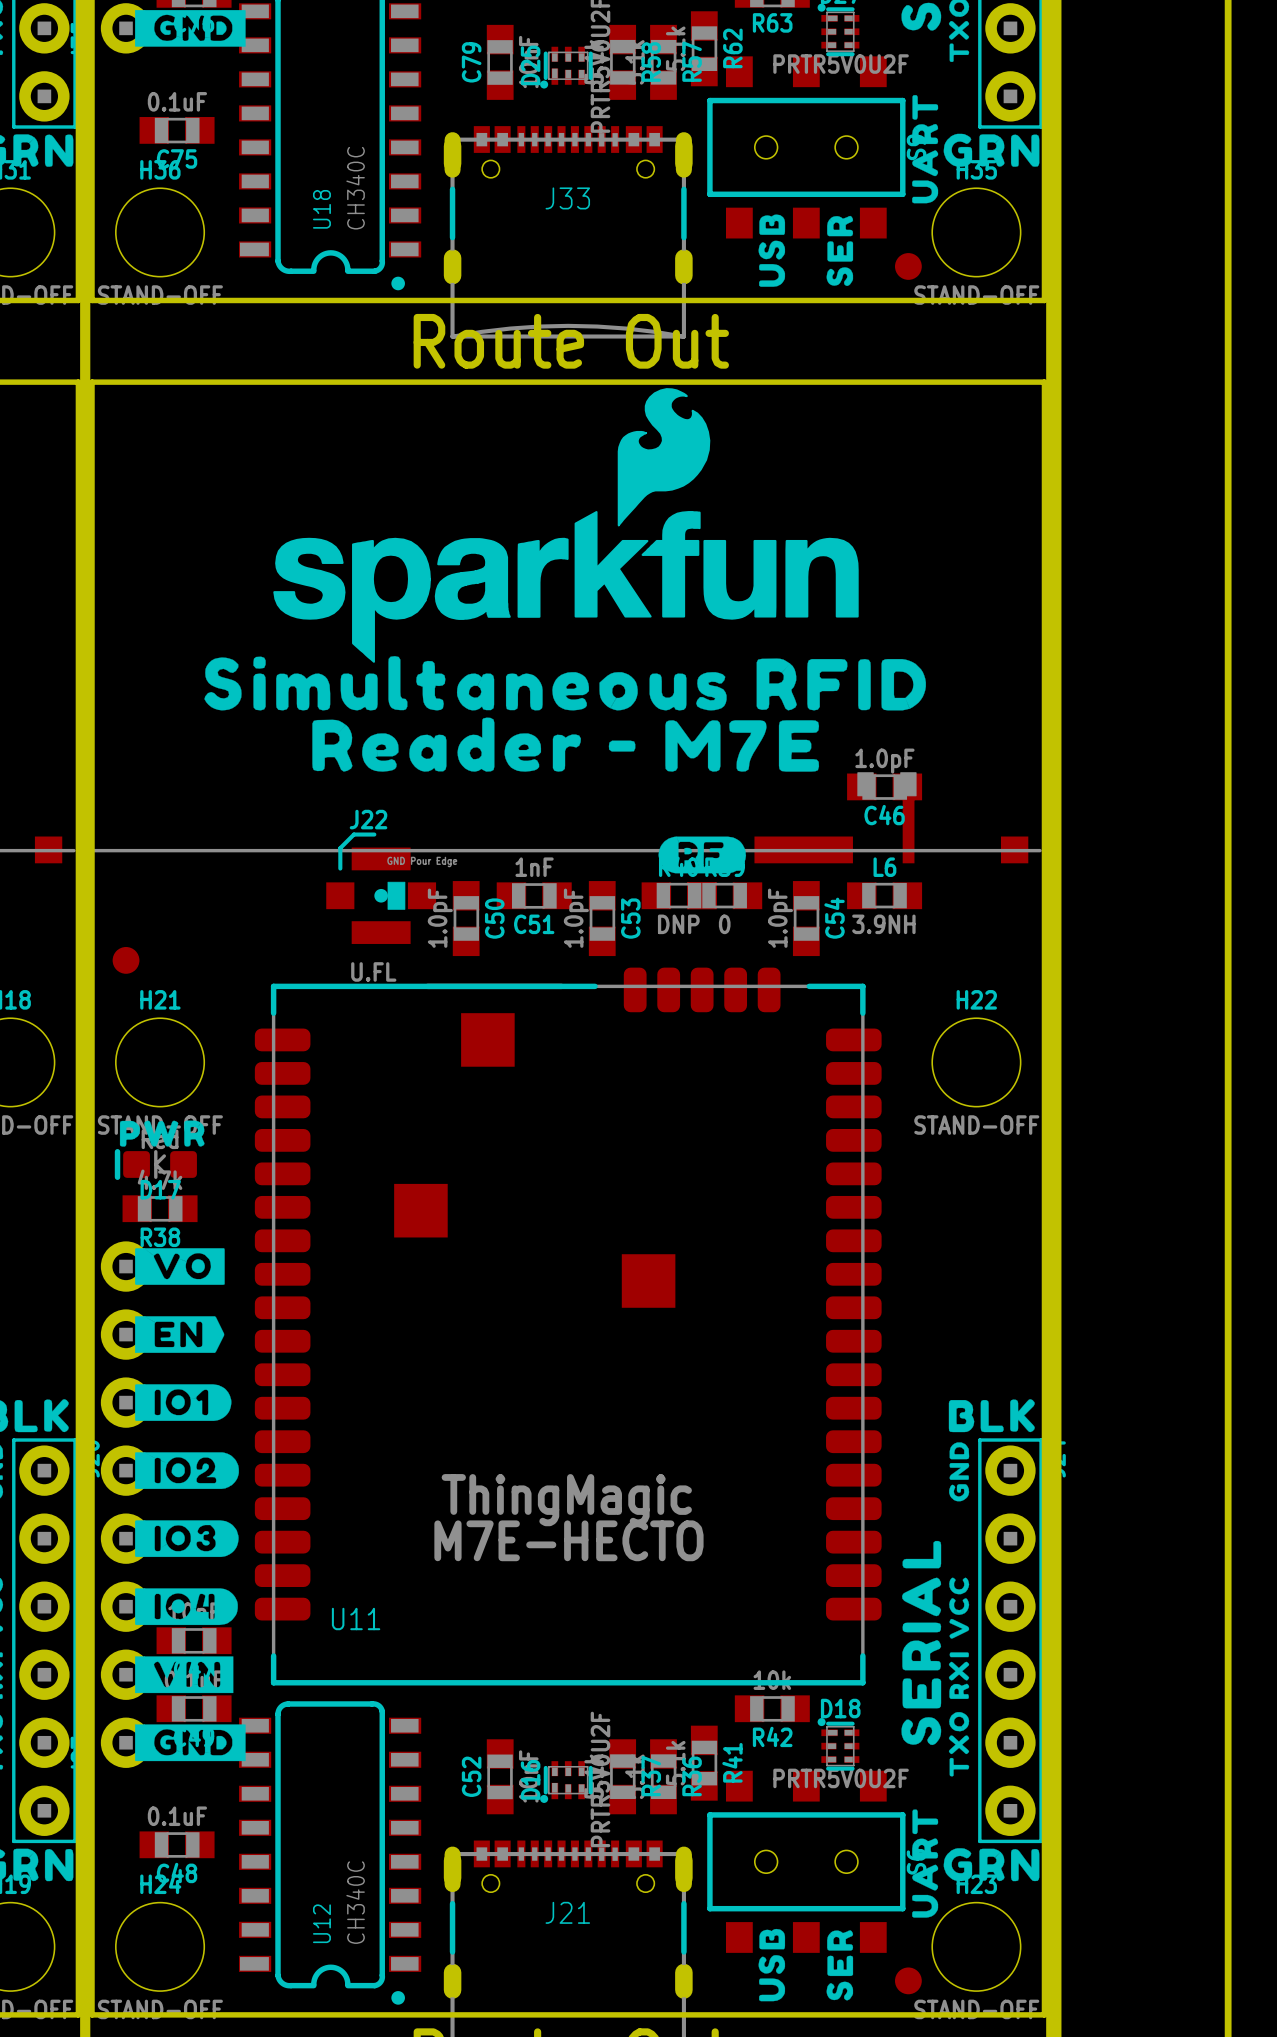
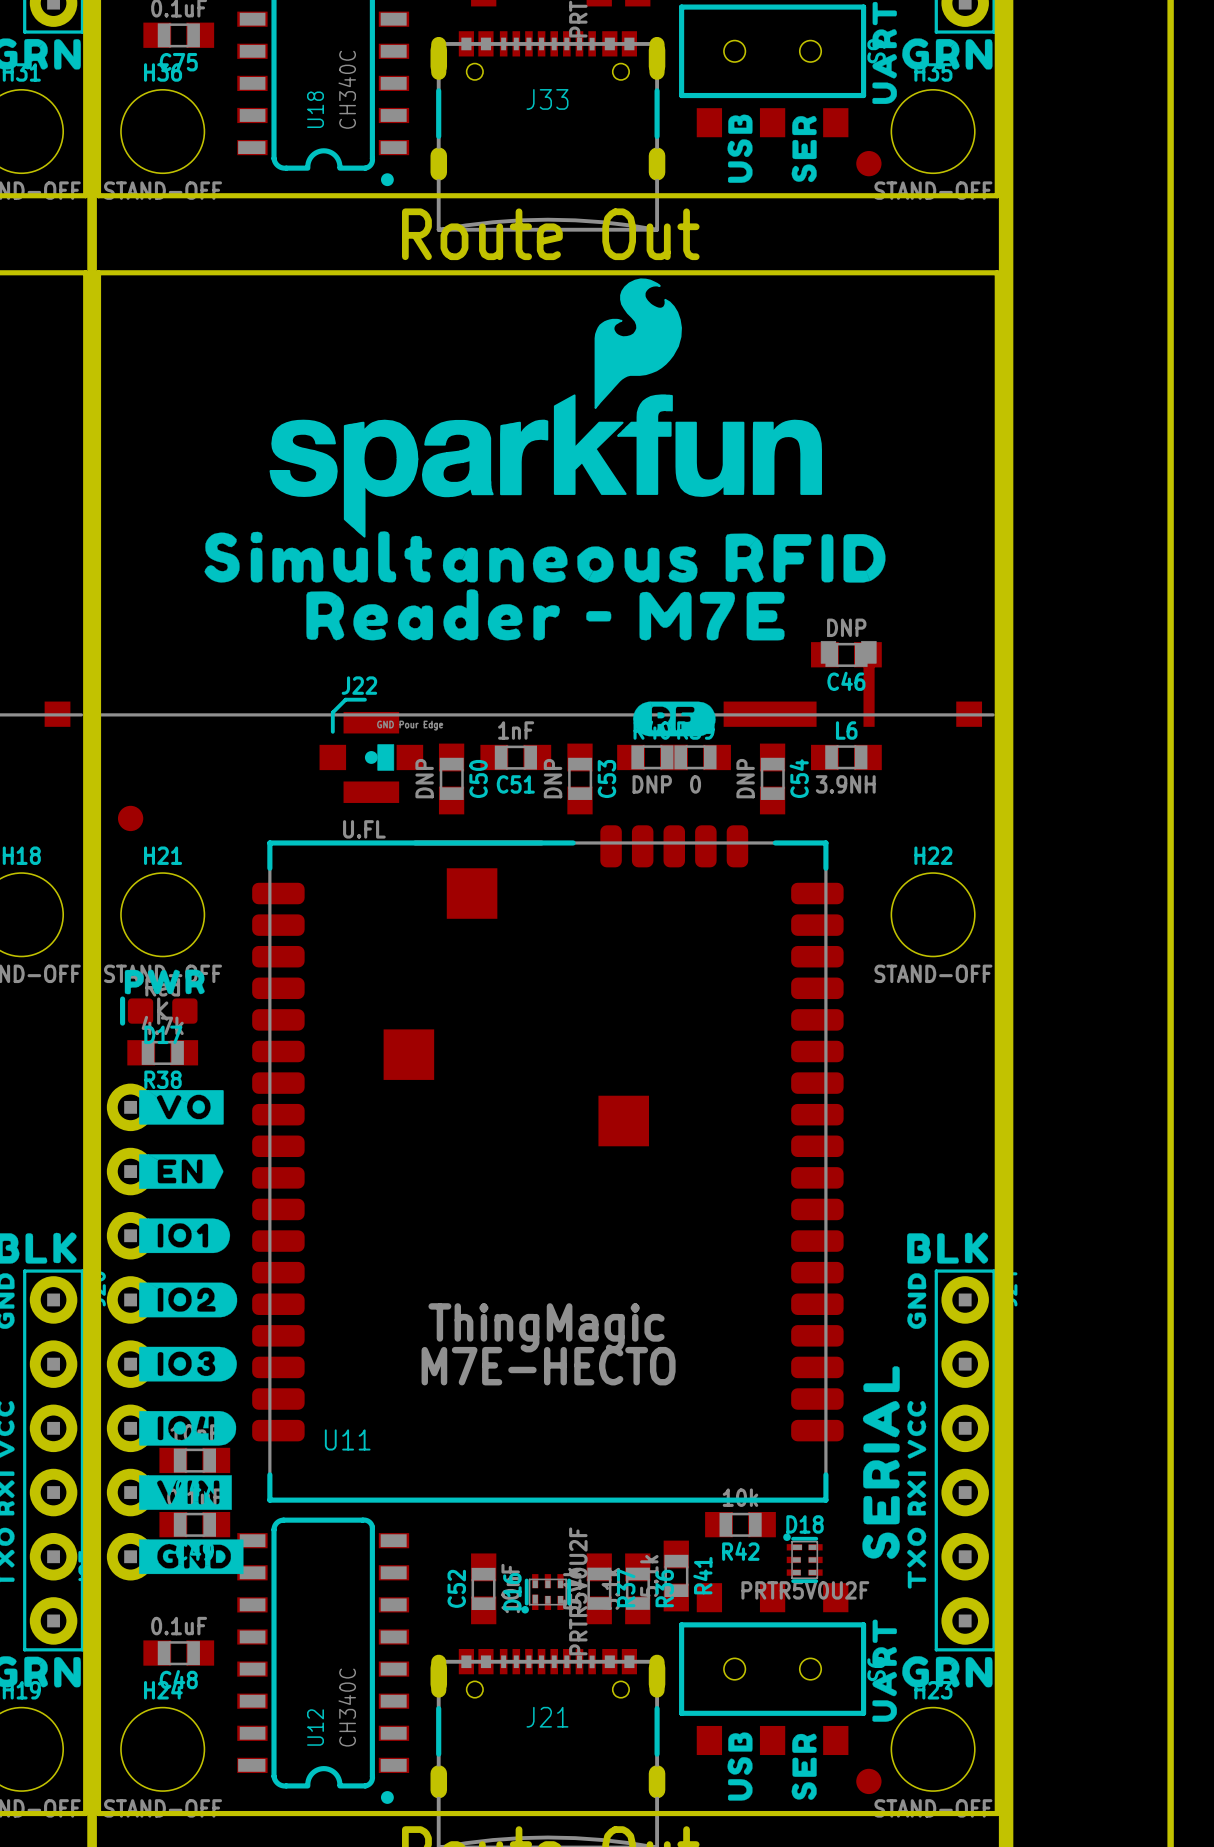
C46 value: 1.0pF (884, 761) -> DNP (846, 627)
C50 value: 1.0pF (440, 918) -> DNP (424, 778)
C53 value: 1.0pF (576, 918) -> DNP (553, 778)
C54 value: 1.0pF (780, 918) -> DNP (745, 778)

